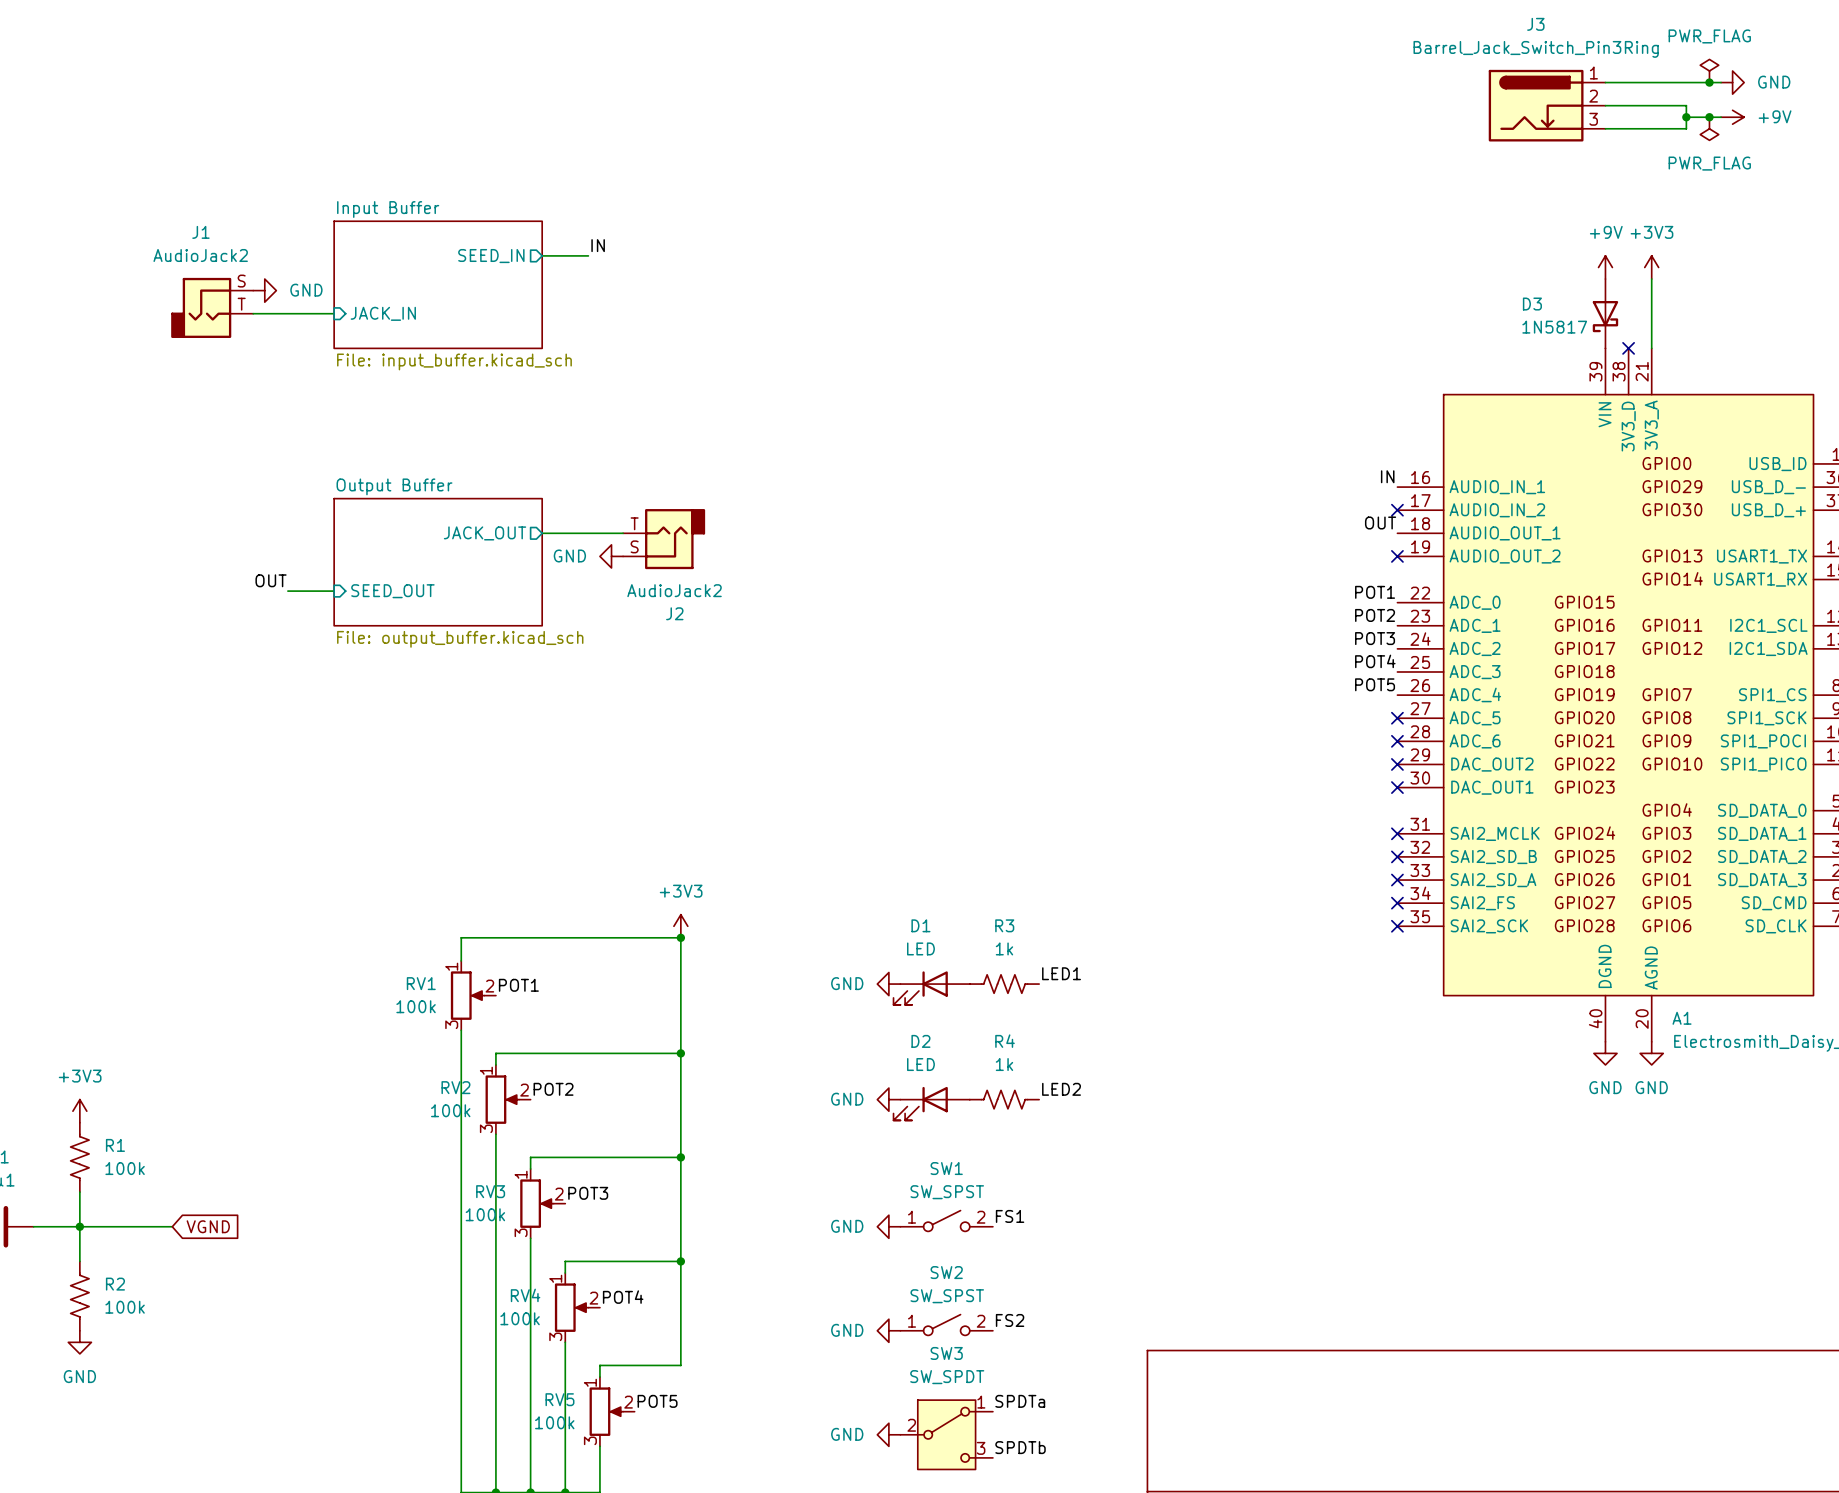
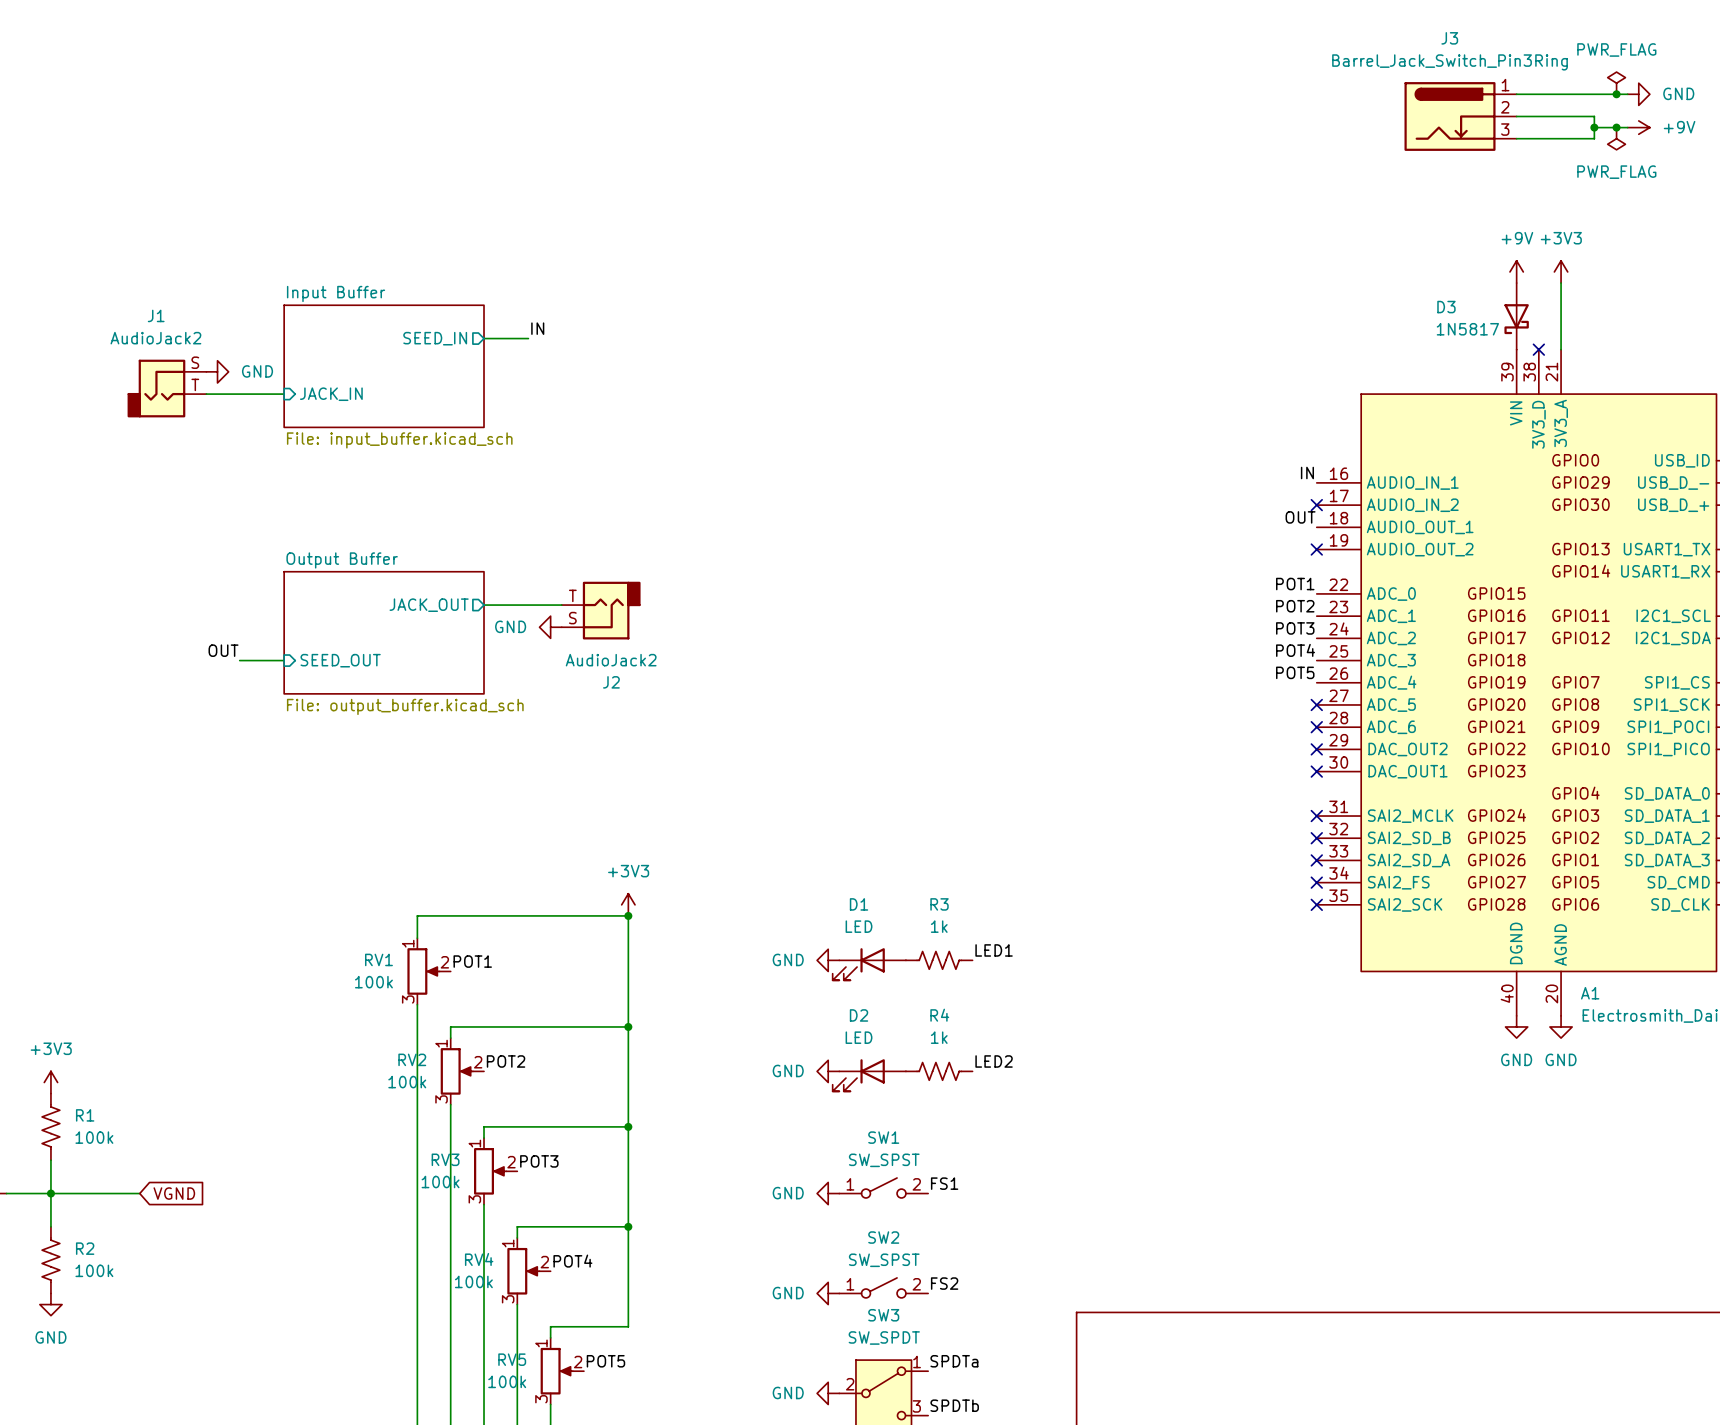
label position: IN (598, 245) -> IN (537, 328)
wire: (542, 255) (588, 255) -> (484, 338) (528, 338)
sheet pin position: SEED_IN (491, 256) -> SEED_IN (435, 338)
sheet Input Buffer position: (438, 284) -> (384, 366)
power symbol position: GND (264, 290) -> GND (217, 371)
J1 position: (212, 307) -> (166, 388)
wire: (253, 313) (334, 313) -> (206, 394) (284, 394)
sheet pin position: JACK_IN (383, 313) -> JACK_IN (331, 394)
sheet pin position: JACK_OUT (485, 533) -> JACK_OUT (429, 605)
wire: (542, 533) (623, 533) -> (484, 605) (561, 605)
J2 position: (664, 539) -> (601, 610)
power symbol position: GND (611, 556) -> GND (550, 627)
sheet Output Buffer position: (438, 562) -> (384, 632)
label position: OUT (271, 580) -> OUT (223, 650)
wire: (287, 591) (334, 591) -> (239, 660) (284, 660)
sheet pin position: SEED_OUT (392, 591) -> SEED_OUT (340, 660)

